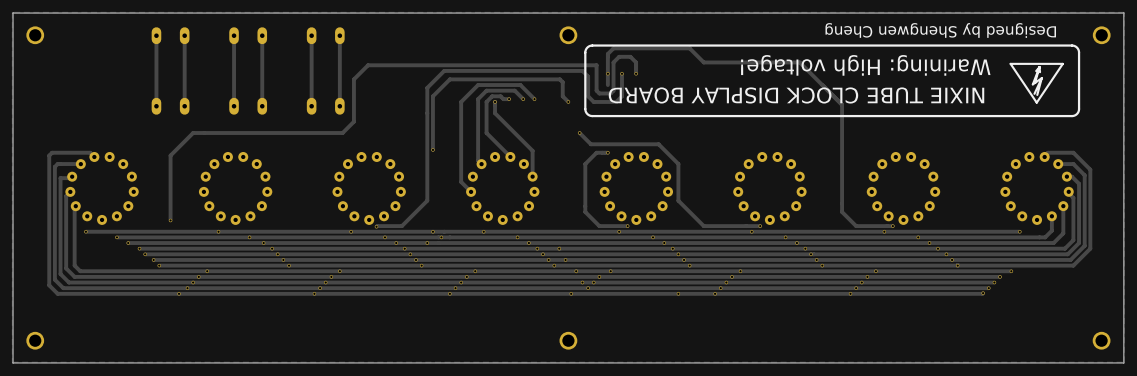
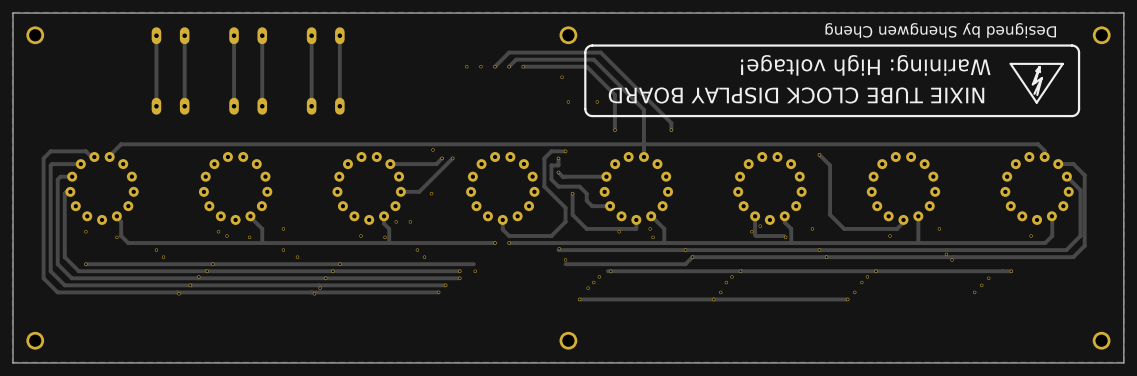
via: none -> (466, 66)
via: none -> (480, 66)
track: none -> (495, 66) (509, 52) (600, 52) (671, 123) (671, 130)
via: none -> (495, 66)
track: none -> (509, 66) (516, 59) (593, 59) (643, 109) (643, 156)
via: none -> (509, 66)
track: none -> (523, 66) (586, 66) (614, 94) (614, 130)
via: none -> (523, 66)
via: (607, 73) -> none
track: (621, 73) (621, 96) (616, 101) (593, 101) (588, 96) (588, 76) (582, 70) (444, 70) (427, 87) (427, 200) (401, 226) (376, 226) -> none
via: (621, 73) -> none
track: (636, 73) (636, 62) (630, 56) (619, 56) (613, 62) (613, 90) (610, 93) (599, 93) (596, 90) (596, 65) (368, 65) (353, 79) (353, 121) (342, 133) (193, 133) (170, 155) (170, 220) -> none
via: (636, 73) -> none
via: none -> (562, 77)
track: (607, 85) (607, 54) (613, 48) (689, 48) (703, 62) (799, 62) (842, 104) (842, 211) (856, 226) (892, 226) -> none
track: (509, 99) (492, 96) (486, 101) (486, 133) (510, 156) -> none
via: (509, 99) -> none
track: (523, 99) (514, 90) (486, 90) (478, 99) (478, 160) (481, 164) -> none
via: (523, 99) -> none
track: (534, 99) (520, 85) (478, 85) (461, 101) (461, 181) (471, 191) -> none
via: (534, 99) -> none
track: (495, 101) (495, 113) (532, 150) (532, 176) -> none
via: (495, 101) -> none
track: (568, 101) (562, 96) (562, 82) (559, 79) (449, 79) (432, 96) (432, 149) -> none
via: none -> (597, 101)
via: none -> (614, 130)
via: none -> (671, 130)
track: (579, 133) (590, 144) -> (109, 156) (121, 144) (590, 144)
via: (579, 133) -> none
track: (658, 144) (678, 164) (678, 200) (703, 226) (760, 226) -> (658, 144) (1038, 144) (1044, 150) (1044, 156)
track: none -> (565, 151) (551, 151) (544, 158) (544, 186) (565, 207) (565, 221) (551, 235) (509, 235) (502, 229) (502, 219)
via: none -> (565, 151)
track: (607, 152) (596, 152) (585, 164) (585, 211) (599, 226) (627, 226) -> none
via: (607, 152) -> none
track: none -> (819, 154) (830, 165) (830, 214) (844, 228) (897, 228) (903, 222) (903, 219)
via: none -> (819, 154)
track: (94, 156) (90, 152) (52, 152) (49, 155) (49, 285) (57, 293) (983, 293) -> (94, 156) (91, 156) (85, 151) (50, 151) (43, 158) (43, 278) (57, 292) (438, 292)
track: (1044, 156) (1048, 152) (1073, 152) (1090, 169) (1090, 248) (1073, 265) (159, 265) -> none
track: none -> (442, 158) (436, 164) (390, 164)
via: none -> (442, 158)
track: none -> (452, 158) (419, 191) (400, 191)
via: none -> (452, 158)
track: none -> (558, 158) (558, 165) (551, 165) (551, 179) (558, 186) (579, 186) (586, 193) (586, 200) (592, 206) (610, 206)
via: none -> (558, 158)
track: (80, 164) (57, 164) (54, 166) (54, 279) (63, 288) (988, 288) -> (80, 164) (50, 165) (50, 271) (64, 285) (445, 285)
track: none -> (558, 172) (562, 176) (606, 176)
via: none -> (558, 172)
track: (72, 176) (60, 178) (60, 274) (68, 282) (994, 282) -> (72, 176) (60, 176) (57, 179) (57, 264) (71, 278) (459, 278)
track: (1066, 176) (1071, 176) (1079, 183) (1079, 243) (1067, 254) (145, 254) -> (1066, 176) (1080, 190) (1080, 235) (1066, 250) (558, 250)
track: (70, 191) (66, 196) (66, 268) (74, 276) (1000, 276) -> none
track: (1068, 191) (1073, 197) (1073, 240) (1064, 248) (139, 248) -> none
via: none -> (431, 193)
track: none -> (572, 193) (572, 214) (586, 228) (636, 228) (636, 219)
via: none -> (572, 193)
track: (75, 206) (74, 265) (80, 271) -> (70, 191) (64, 193) (64, 257) (80, 271)
track: (1063, 206) (1063, 233) (1053, 243) (1045, 243) -> (1051, 216) (1052, 235) (1045, 243)
track: none -> (116, 216) (121, 221) (121, 235) (128, 243)
track: none -> (250, 216) (262, 228) (262, 243)
track: none -> (384, 216) (384, 223) (389, 228) (389, 243)
track: none -> (651, 216) (664, 228) (664, 243)
track: none -> (755, 216) (756, 235) (784, 235)
track: none -> (784, 216) (784, 222) (791, 228) (791, 243)
track: none -> (918, 216) (918, 243)
track: (1050, 217) (1051, 230) (1045, 237) (116, 237) -> none
via: (170, 220) -> none
via: none -> (396, 221)
via: none -> (410, 221)
via: (376, 226) -> none
via: (627, 226) -> none
via: (892, 226) -> none
via: none -> (283, 228)
via: none -> (650, 228)
via: none -> (812, 228)
via: none -> (939, 228)
via: (351, 231) -> none
via: (432, 231) -> none
via: (483, 231) -> none
via: (884, 231) -> none
track: (1019, 231) (85, 231) -> none
via position: (1019, 231) -> (1031, 235)
via: none -> (226, 235)
via: none -> (361, 235)
via: none -> (890, 235)
via: (441, 237) -> none
via: (517, 237) -> none
via: (918, 237) -> none
via: (128, 243) -> none
via: (263, 243) -> none
via: (396, 243) -> none
via: (427, 243) -> none
via: none -> (495, 243)
track: (509, 243) (495, 243) -> none
via: none -> (509, 243)
via: (528, 243) -> none
via: (664, 243) -> none
via: (796, 243) -> none
via: (929, 243) -> none
via: (139, 248) -> none
via: (272, 248) -> none
via: (404, 248) -> none
via: (537, 248) -> none
via: (672, 248) -> none
via: (805, 248) -> none
via: (937, 248) -> none
via: none -> (156, 250)
via: none -> (283, 250)
via: none -> (417, 250)
via: none -> (685, 250)
via: none -> (819, 250)
via: (145, 254) -> none
via: (277, 254) -> none
via: (410, 254) -> none
via: (542, 254) -> none
via: (678, 254) -> none
via: (811, 254) -> none
via: none -> (163, 257)
via: none -> (297, 257)
via: none -> (424, 257)
via: none -> (692, 257)
via: none -> (826, 257)
track: (1073, 257) (1070, 259) (153, 259) -> (1073, 257) (692, 257) (685, 264) (565, 264)
via: (153, 259) -> none
via: (283, 259) -> none
via: (416, 259) -> none
via: (548, 259) -> none
via: (684, 259) -> none
via: (816, 259) -> none
via: none -> (85, 264)
via: none -> (212, 264)
via: none -> (339, 264)
track: none -> (473, 264) (85, 264)
via: (159, 265) -> none
via: (289, 265) -> none
via: (421, 265) -> none
via: (554, 265) -> none
via: (689, 265) -> none
via: (822, 265) -> none
via: (957, 265) -> none
via: none -> (332, 271)
via: (339, 271) -> none
via: none -> (459, 271)
via: (576, 271) -> none
track: (607, 271) (459, 271) -> none
via: (331, 276) -> none
via: (466, 276) -> none
via: (1000, 276) -> none
via: none -> (325, 278)
via: none -> (459, 278)
via: none -> (988, 278)
via: (193, 282) -> none
via: (325, 282) -> none
via: (461, 282) -> none
via: (582, 282) -> none
via: (994, 282) -> none
via: none -> (190, 285)
via: none -> (445, 285)
via: none -> (981, 285)
via: (187, 288) -> none
via: (455, 288) -> none
via: (720, 288) -> none
via: (856, 288) -> none
via: (988, 288) -> none
via: none -> (438, 292)
via: none -> (720, 292)
via: none -> (854, 292)
via: none -> (974, 292)
via: (449, 293) -> none
via: (571, 293) -> none
via: (678, 293) -> none
via: (715, 293) -> none
via: (850, 293) -> none
via: (983, 293) -> none
via: none -> (579, 299)
via: none -> (713, 299)
track: none -> (847, 299) (579, 299)
via: none -> (847, 299)

